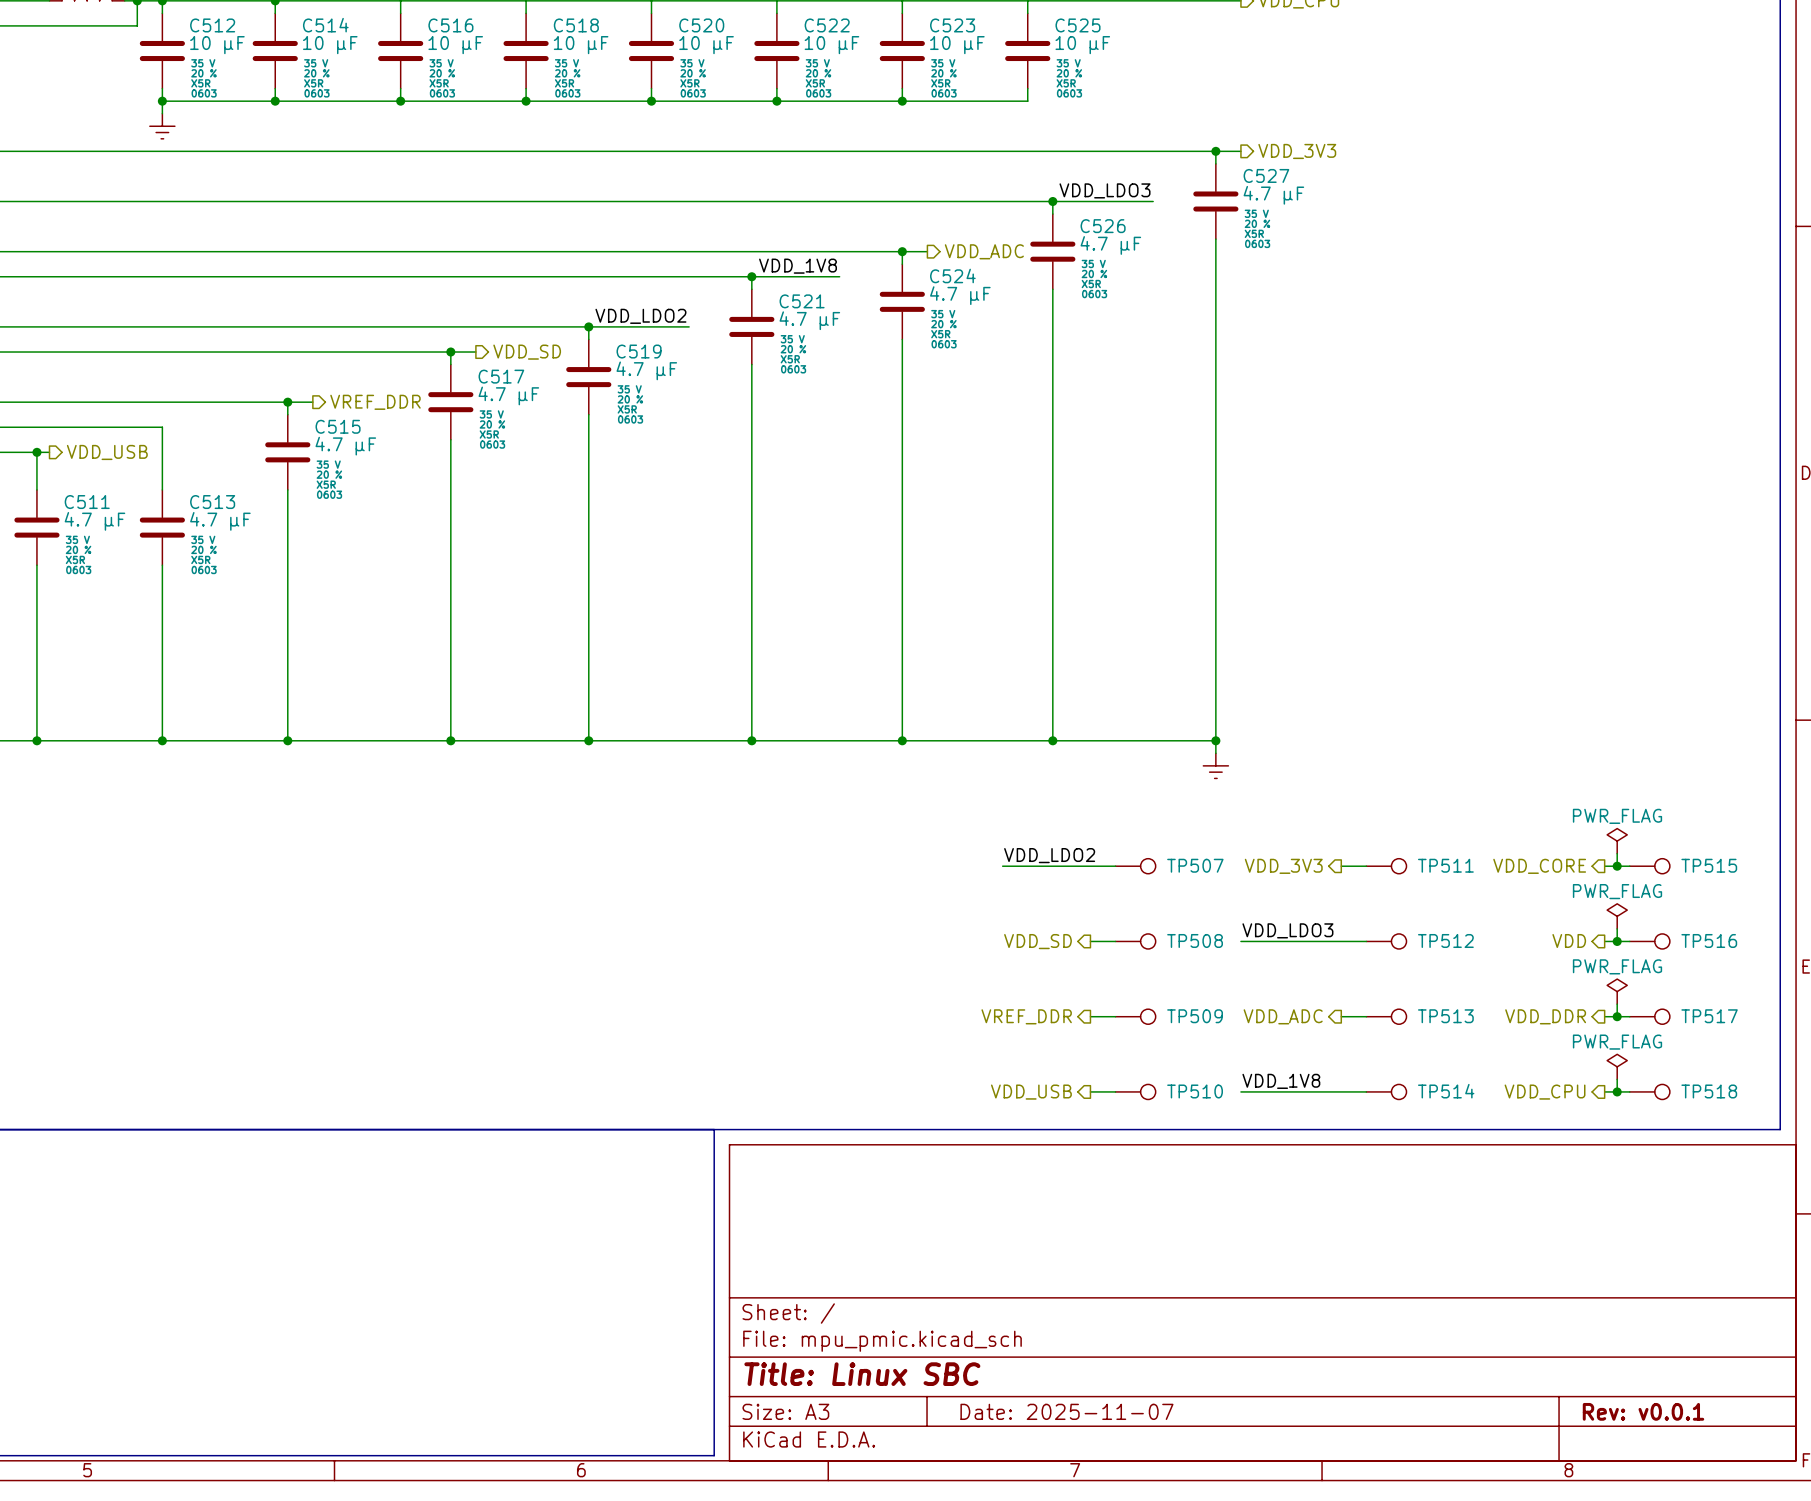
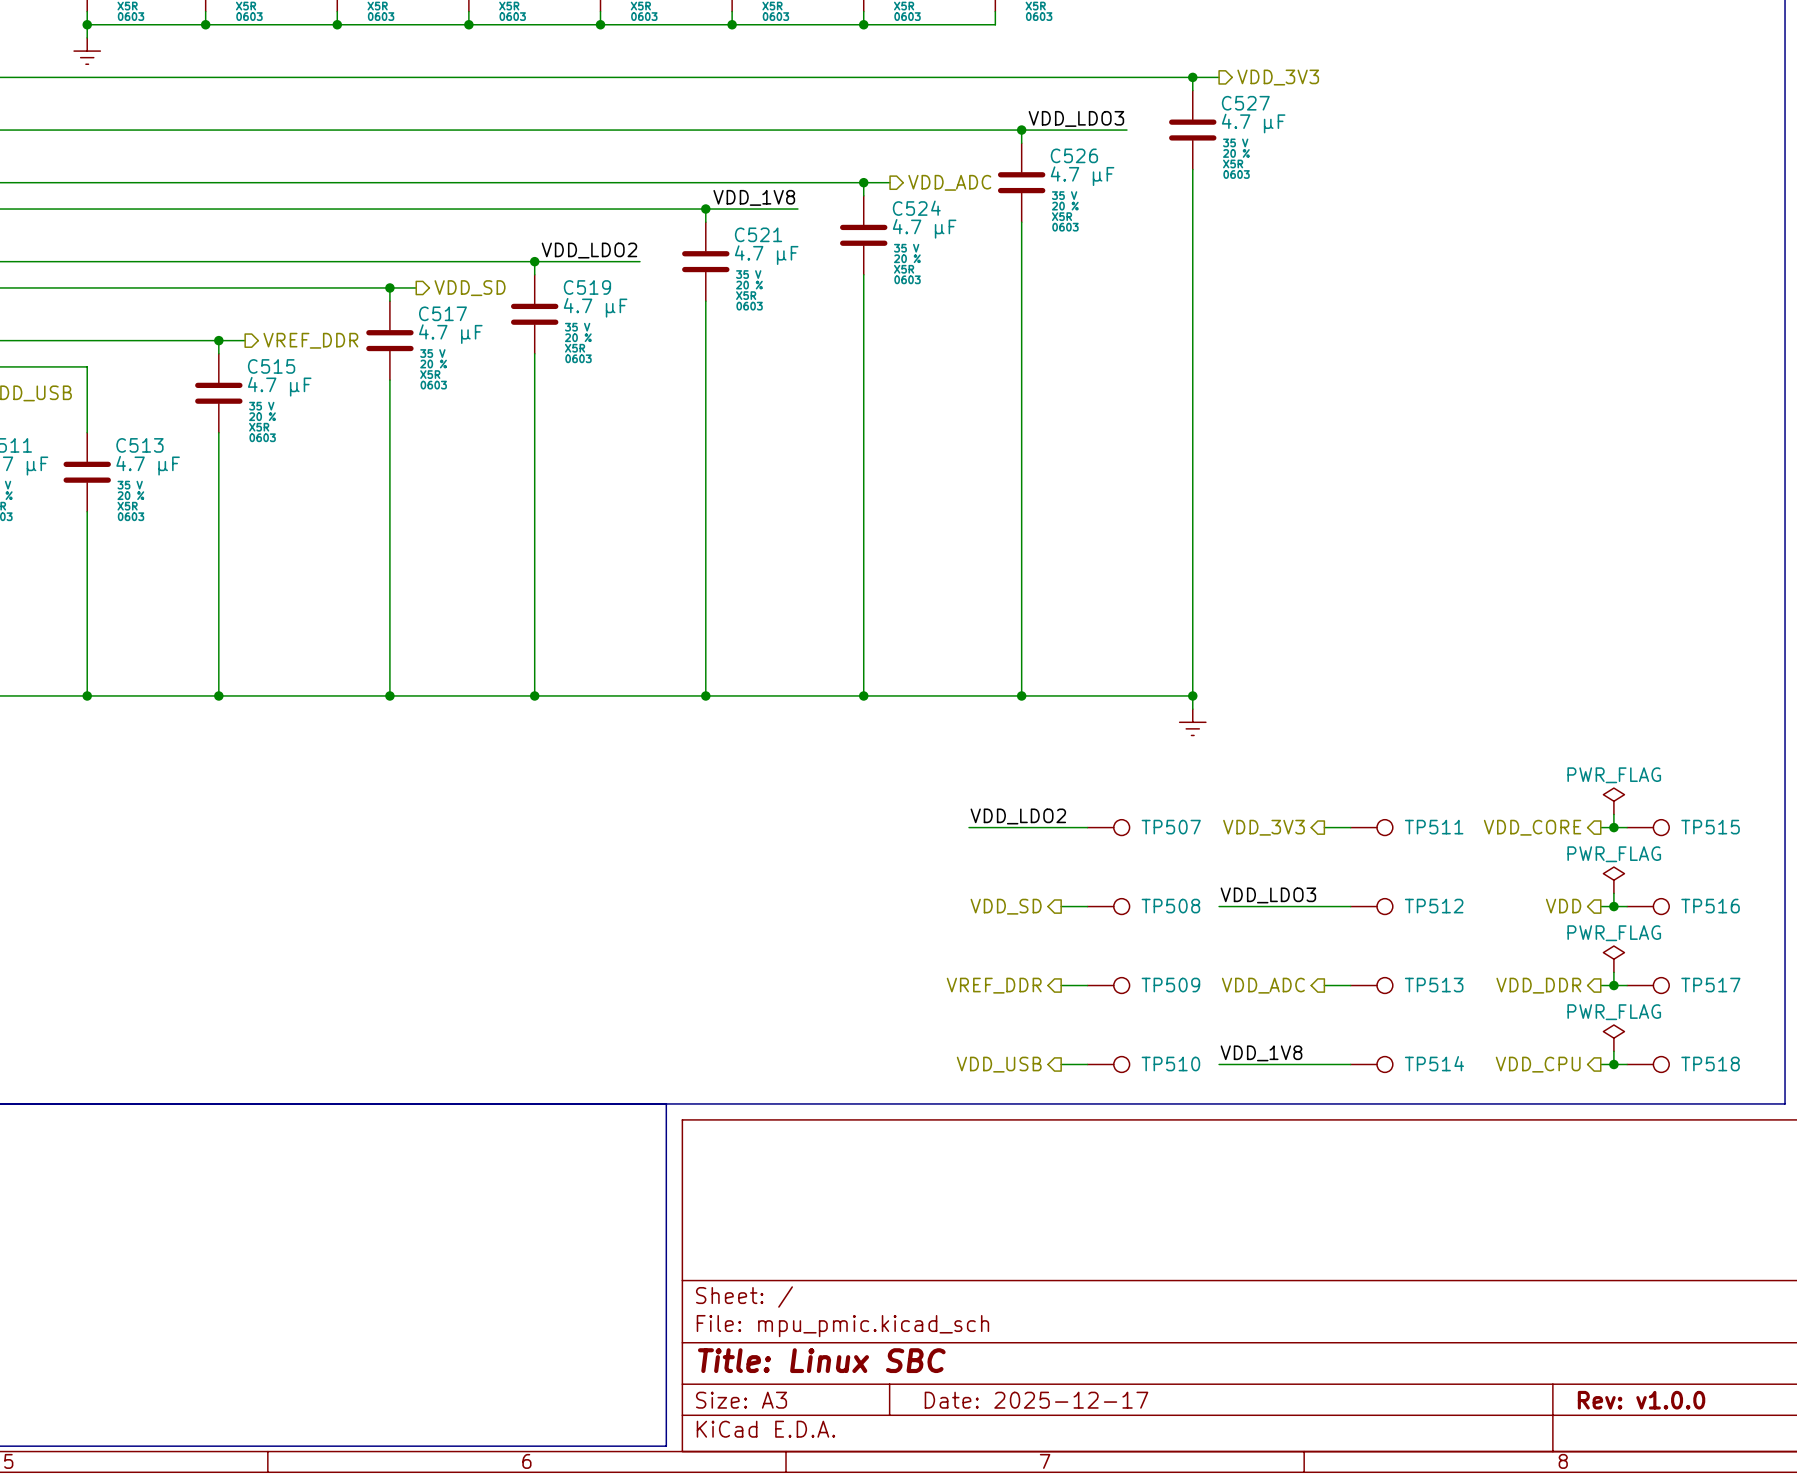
title block: Date: 2025-11-07 (1066, 1411) -> Date: 2025-12-17 (1036, 1400)
title block: Rev: v0.0.1 (1643, 1411) -> Rev: v1.0.0 (1641, 1400)

